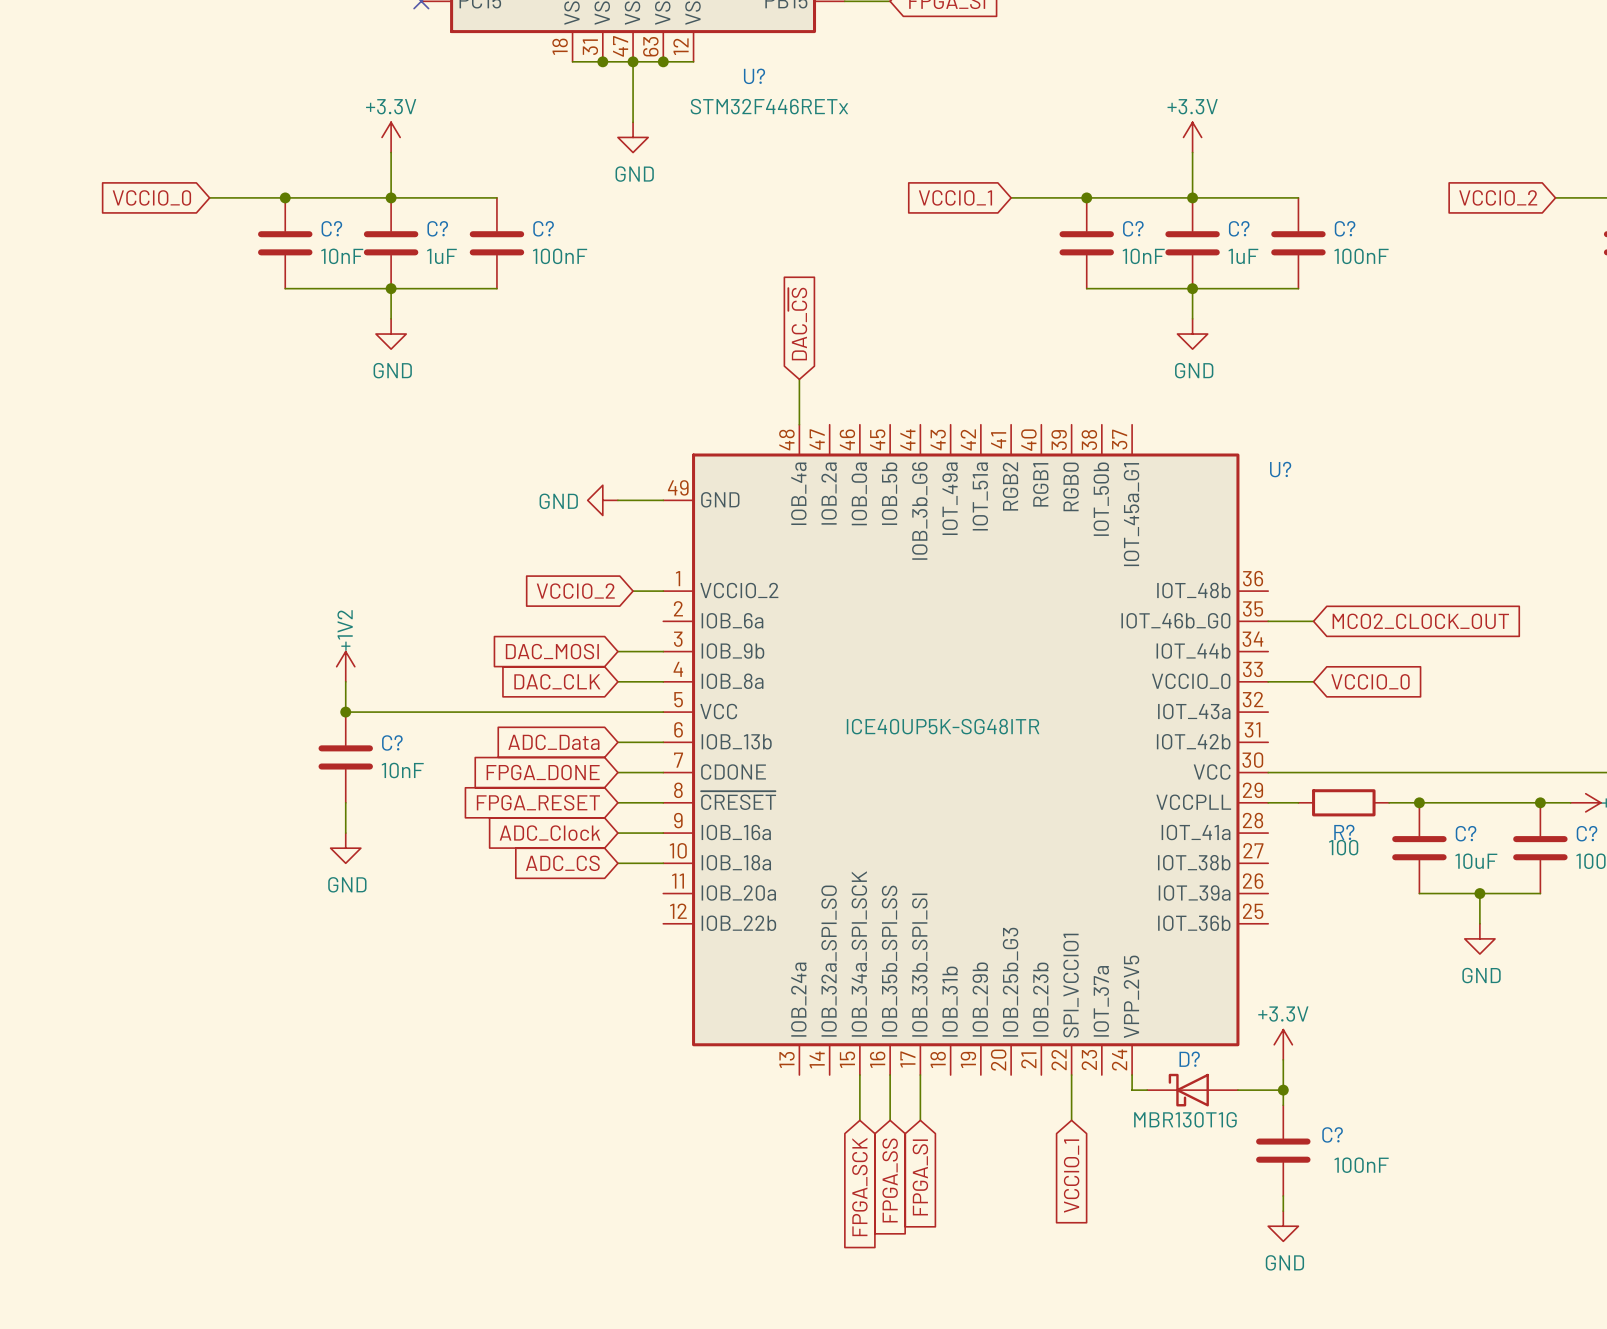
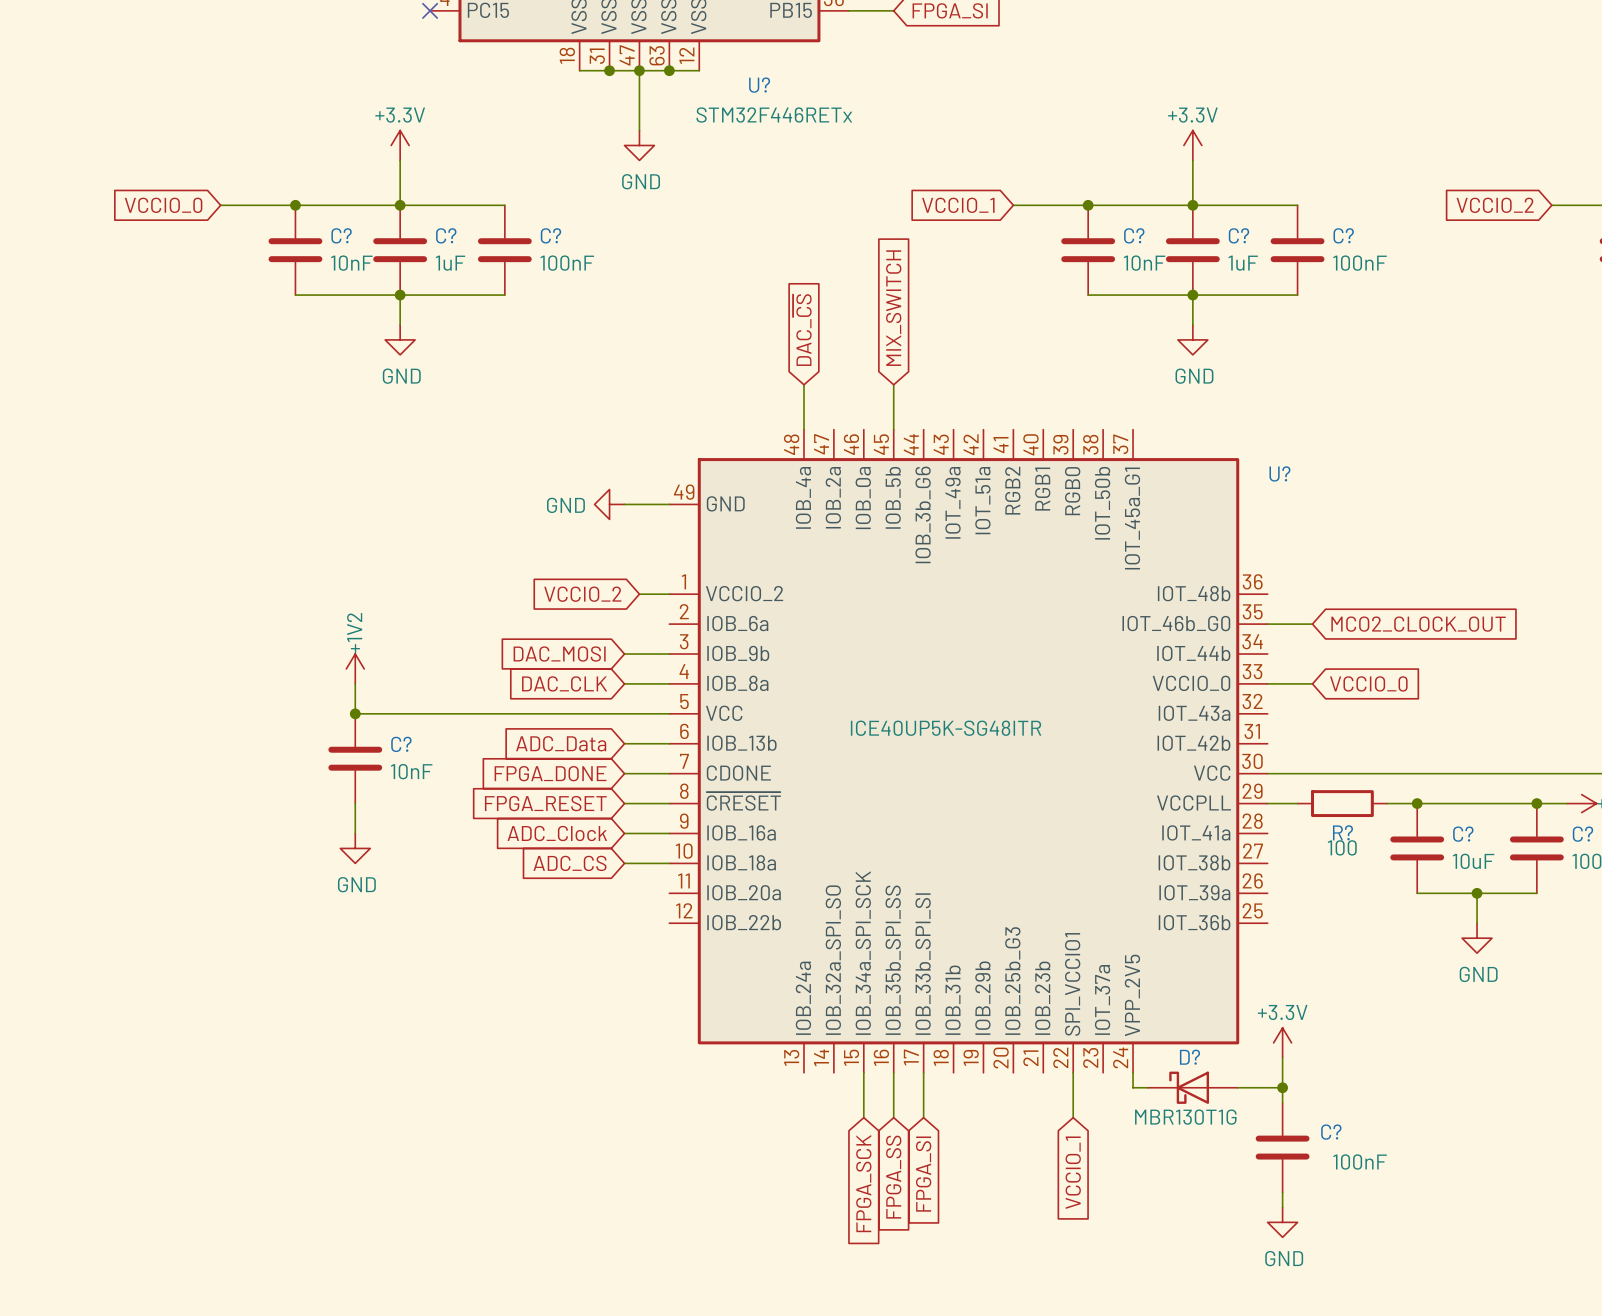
global label: none -> MIX_SWITCH (893, 308)
wire: none -> (893, 384) (893, 429)

